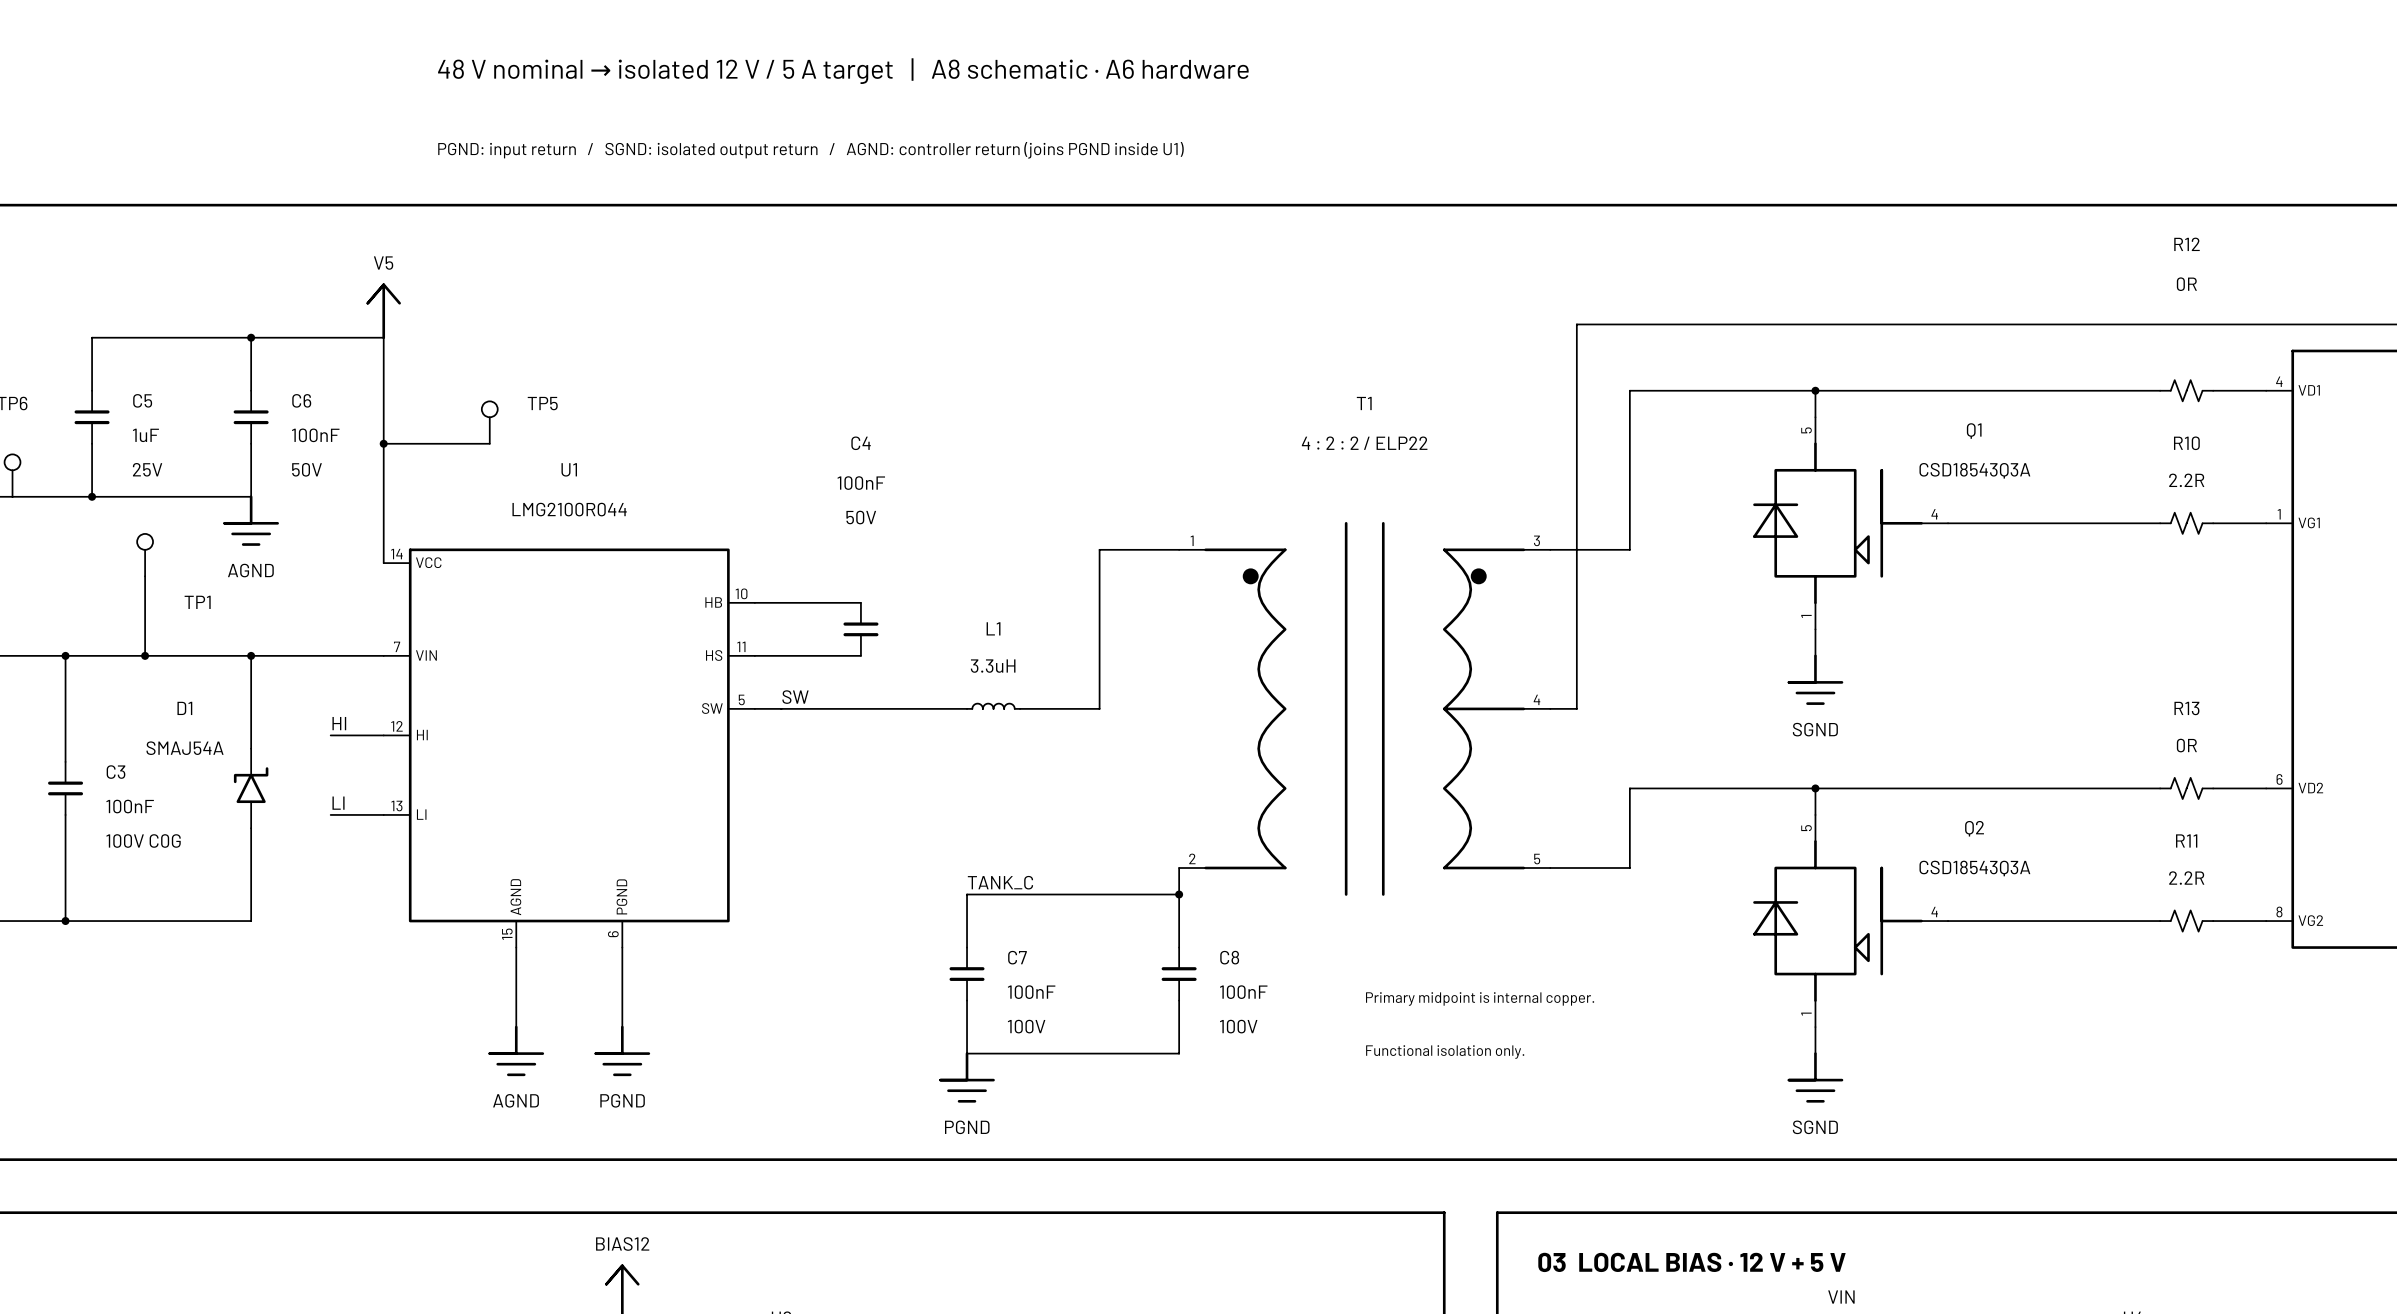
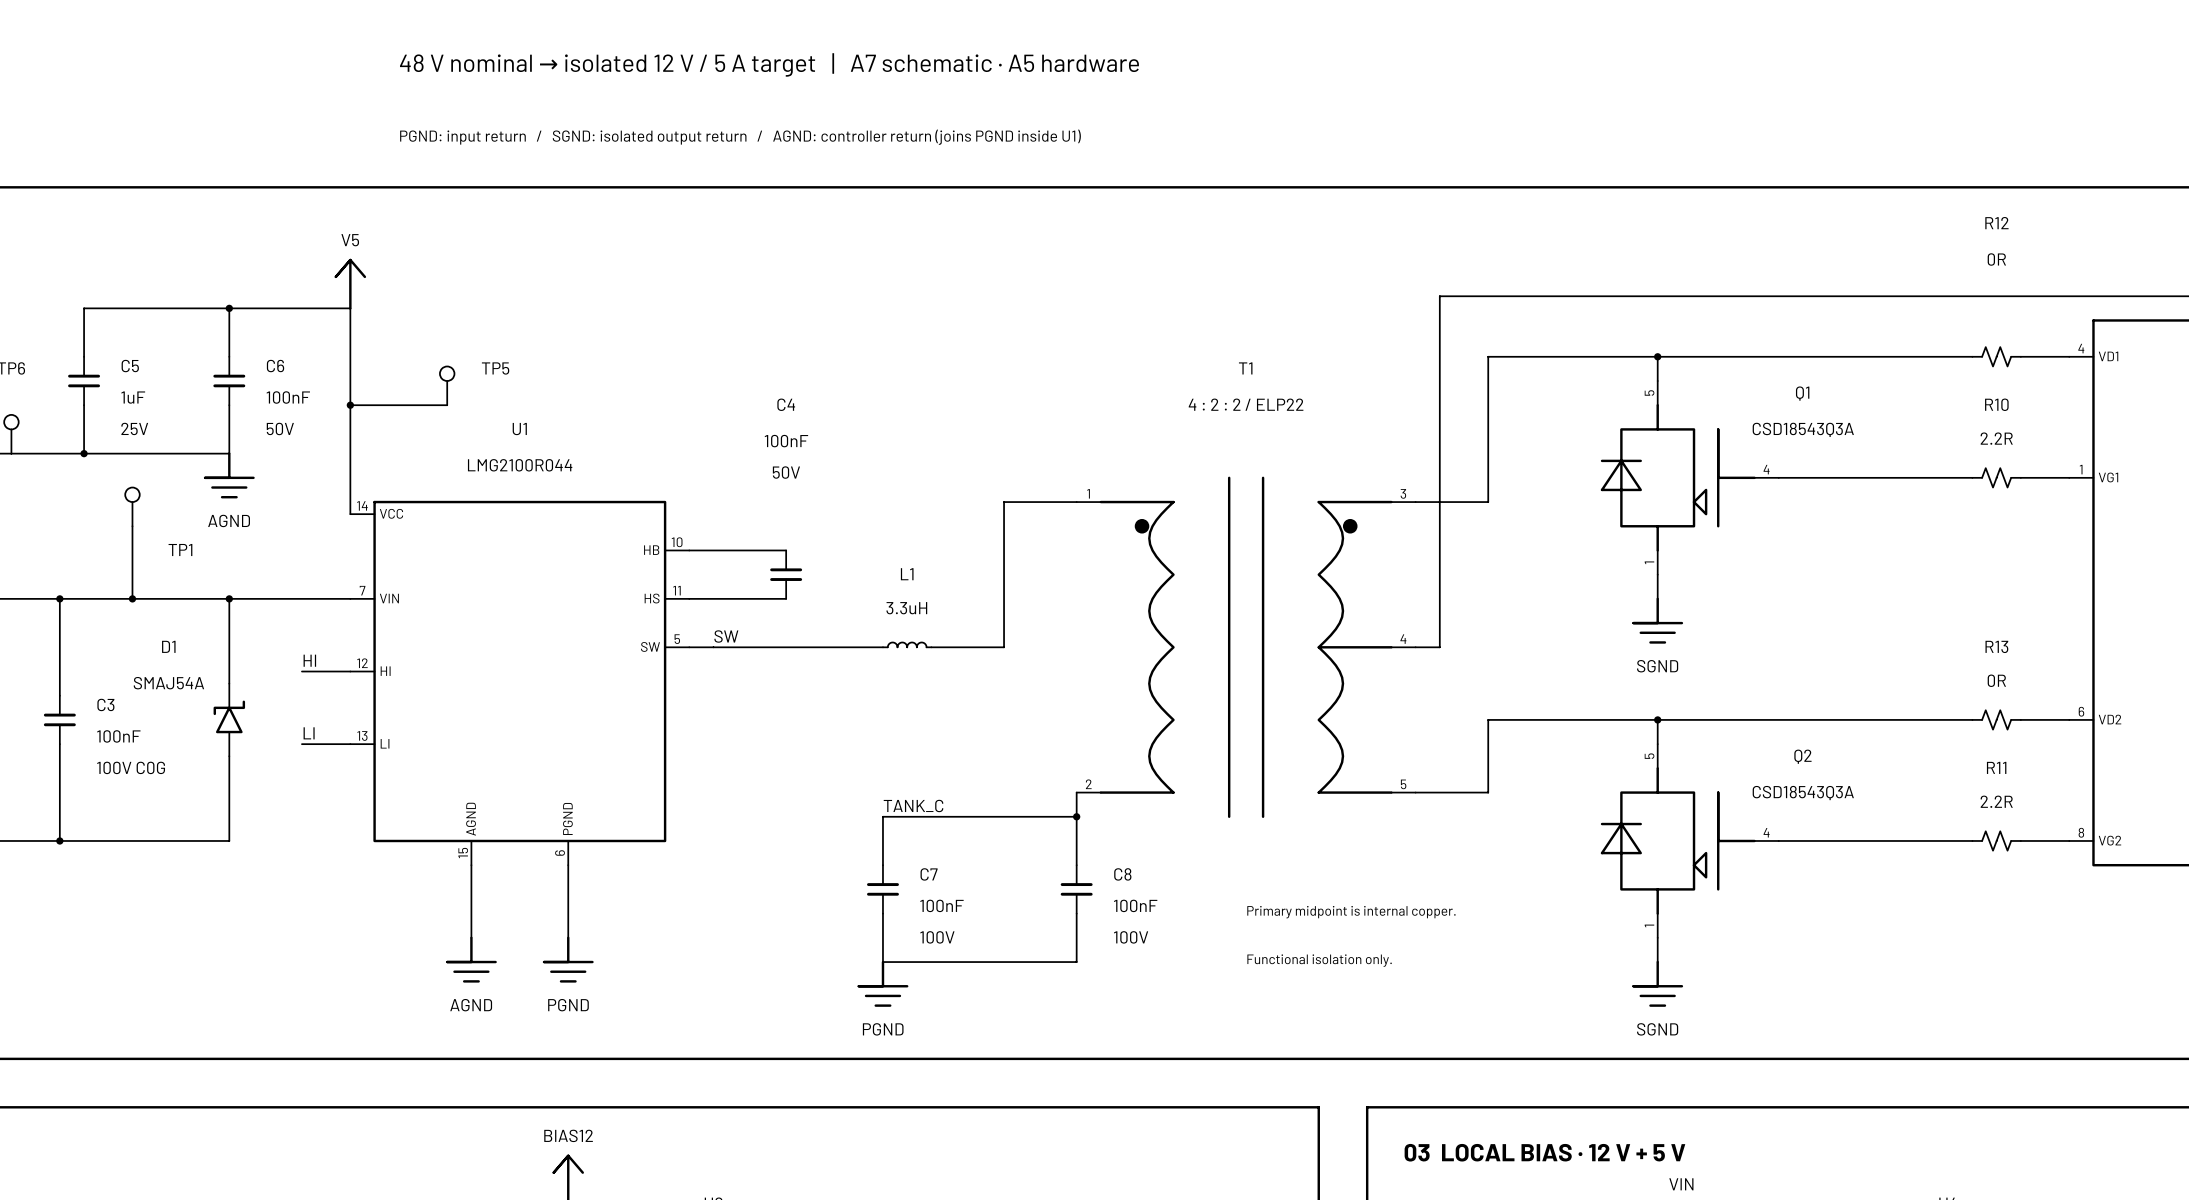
text: 48 V nominal → isolated 12 V / 5 A target | A8 schematic · A6 hardware (843, 71) -> 48 V nominal → isolated 12 V / 5 A target | A7 schematic · A5 hardware (769, 64)

